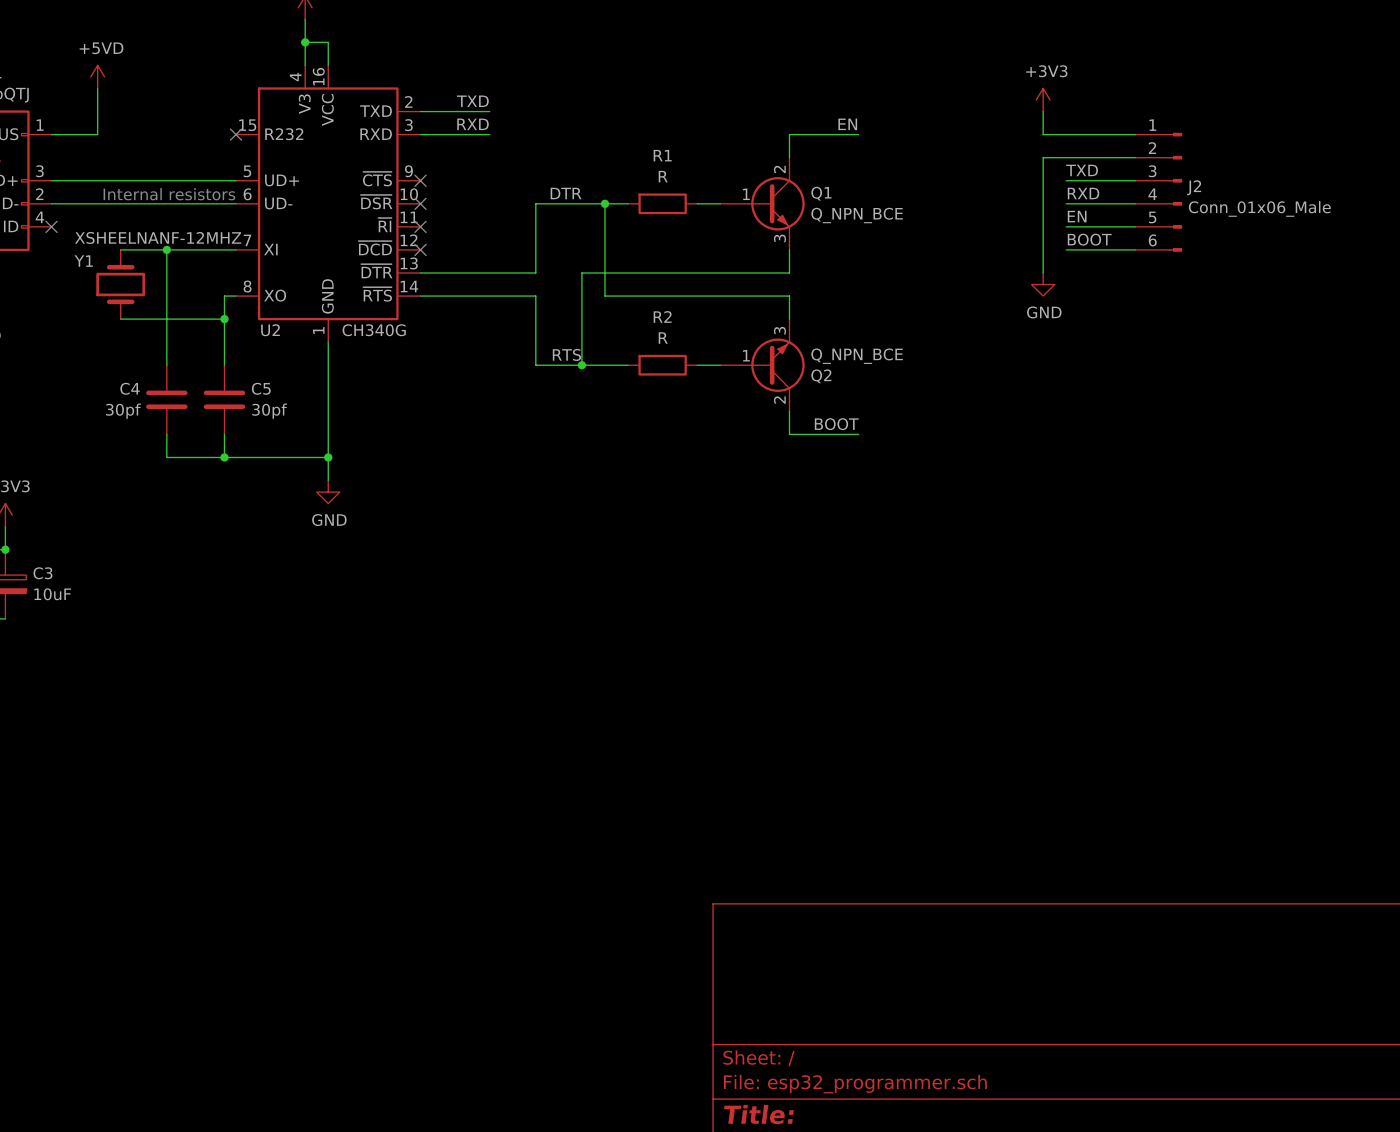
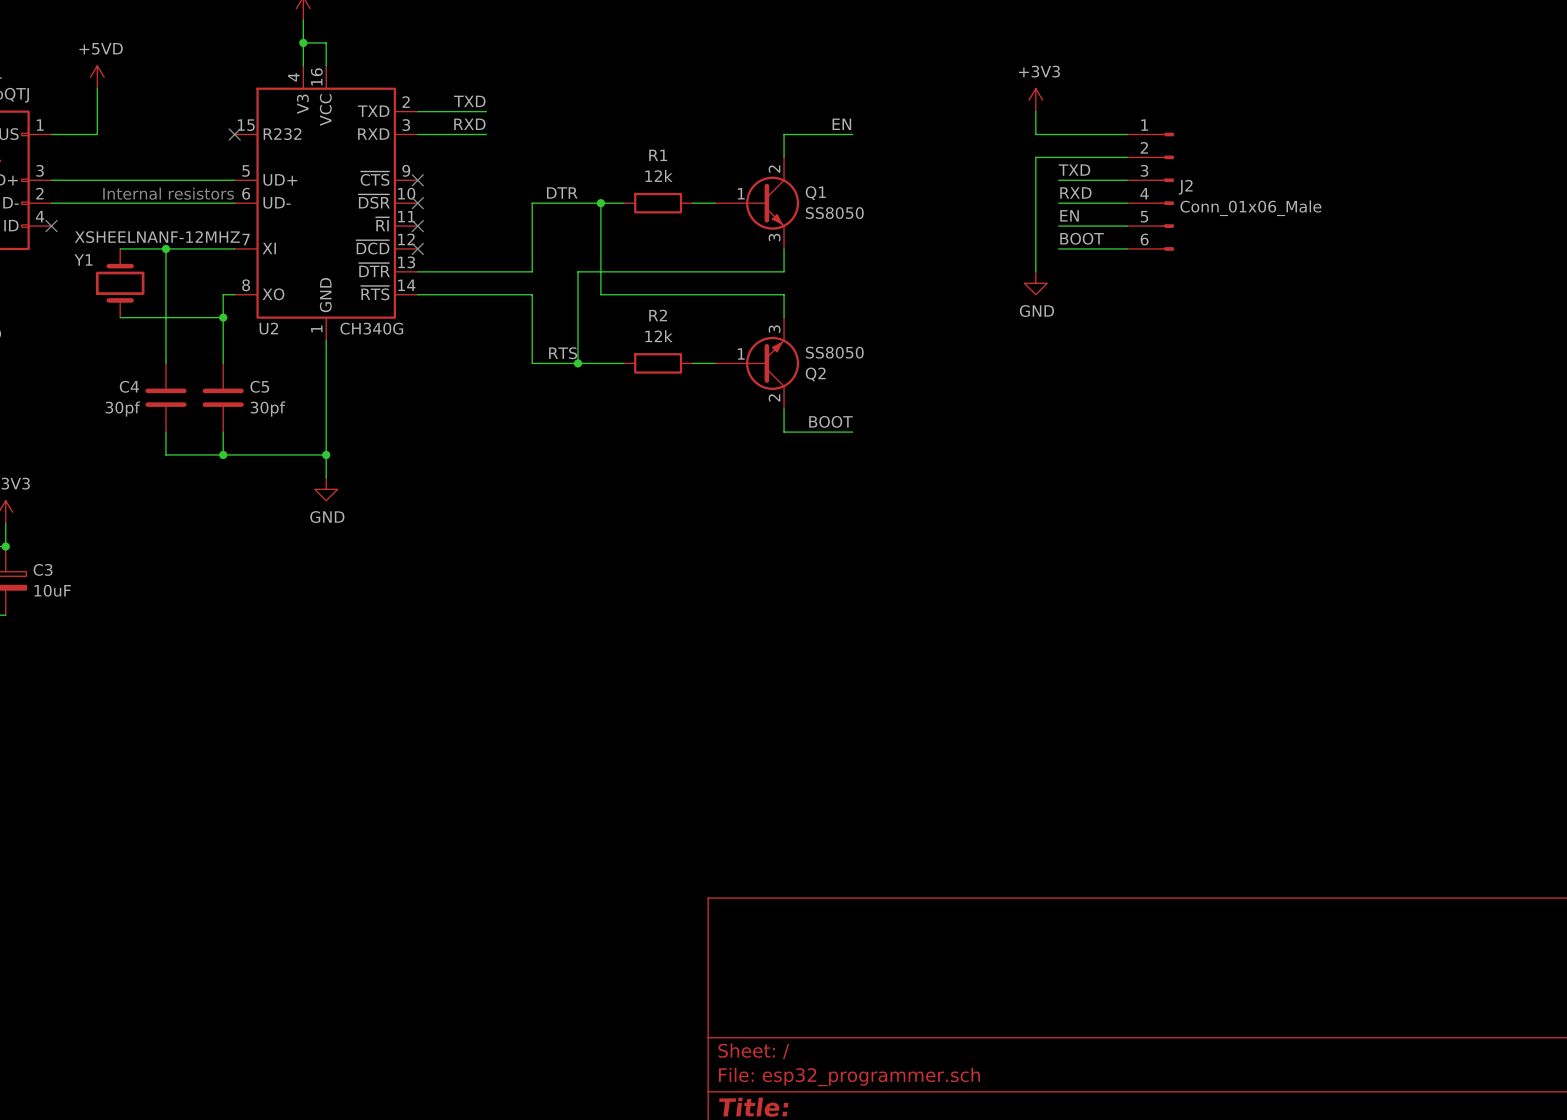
R1 value: R (663, 176) -> 12k (658, 175)
Q1 value: Q_NPN_BCE (857, 215) -> SS8050 (834, 213)
R2 value: R (663, 338) -> 12k (658, 336)
Q2 value: Q_NPN_BCE (857, 356) -> SS8050 (834, 352)

